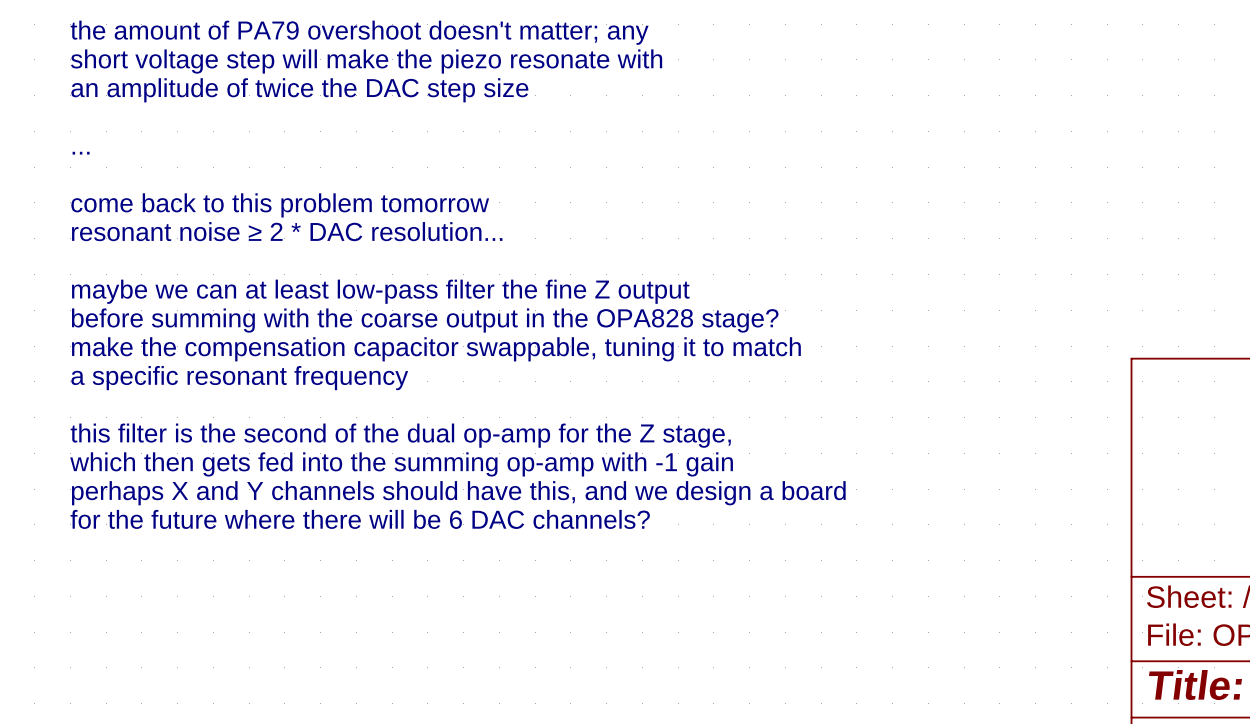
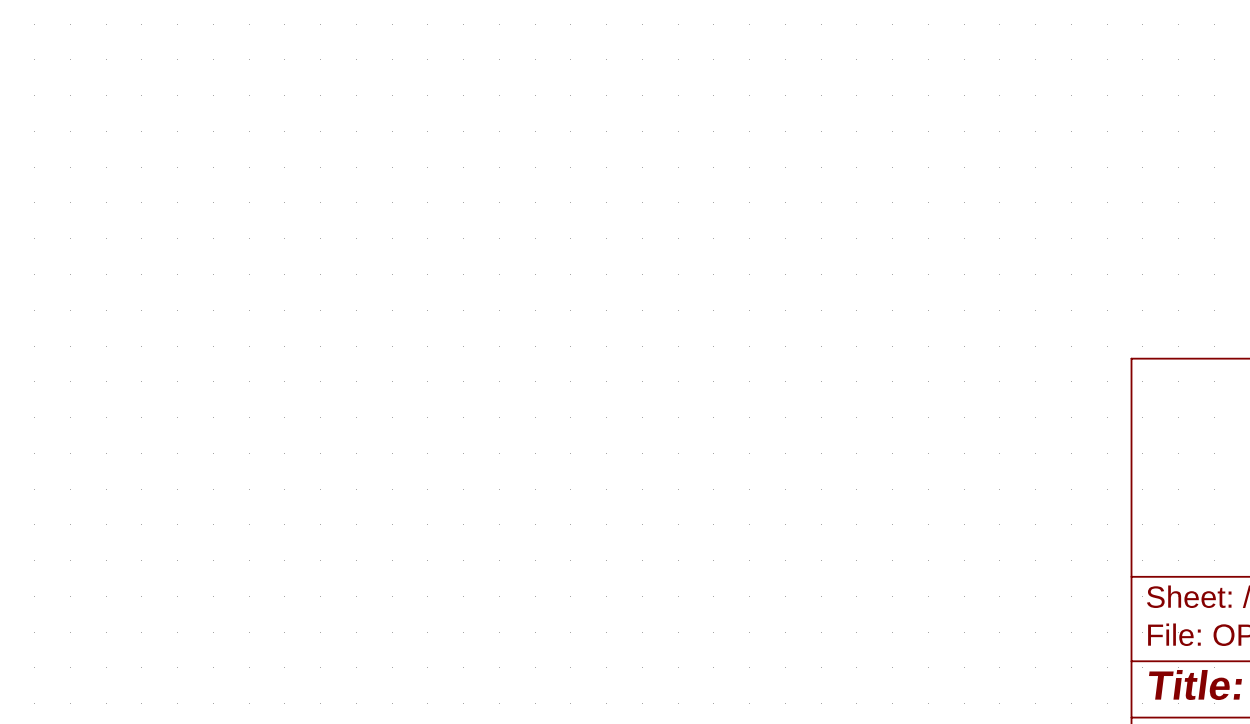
text: the amount of PA79 overshoot doesn't matter; any (359, 32) -> none
text: short voltage step will make the piezo resonate with (366, 61) -> none
text: an amplitude of twice the DAC step size (299, 90) -> none
text: ... (81, 153) -> none
text: come back to this problem tomorrow (280, 205) -> none
text: resonant noise ≥ 2 * DAC resolution... (287, 231) -> none
text: maybe we can at least low-pass filter the fine Z output (380, 291) -> none
text: before summing with the coarse output in the OPA828 stage? (425, 320) -> none
text: make the compensation capacitor swappable, tuning it to match (436, 349) -> none
text: a specific resonant frequency (239, 378) -> none
text: this filter is the second of the dual op-amp for the Z stage, (400, 435) -> none
text: which then gets fed into the summing op-amp with -1 gain (401, 464) -> none
text: perhaps X and Y channels should have this, and we design a board (458, 493) -> none
text: for the future where there will be 6 DAC channels? (360, 519) -> none

